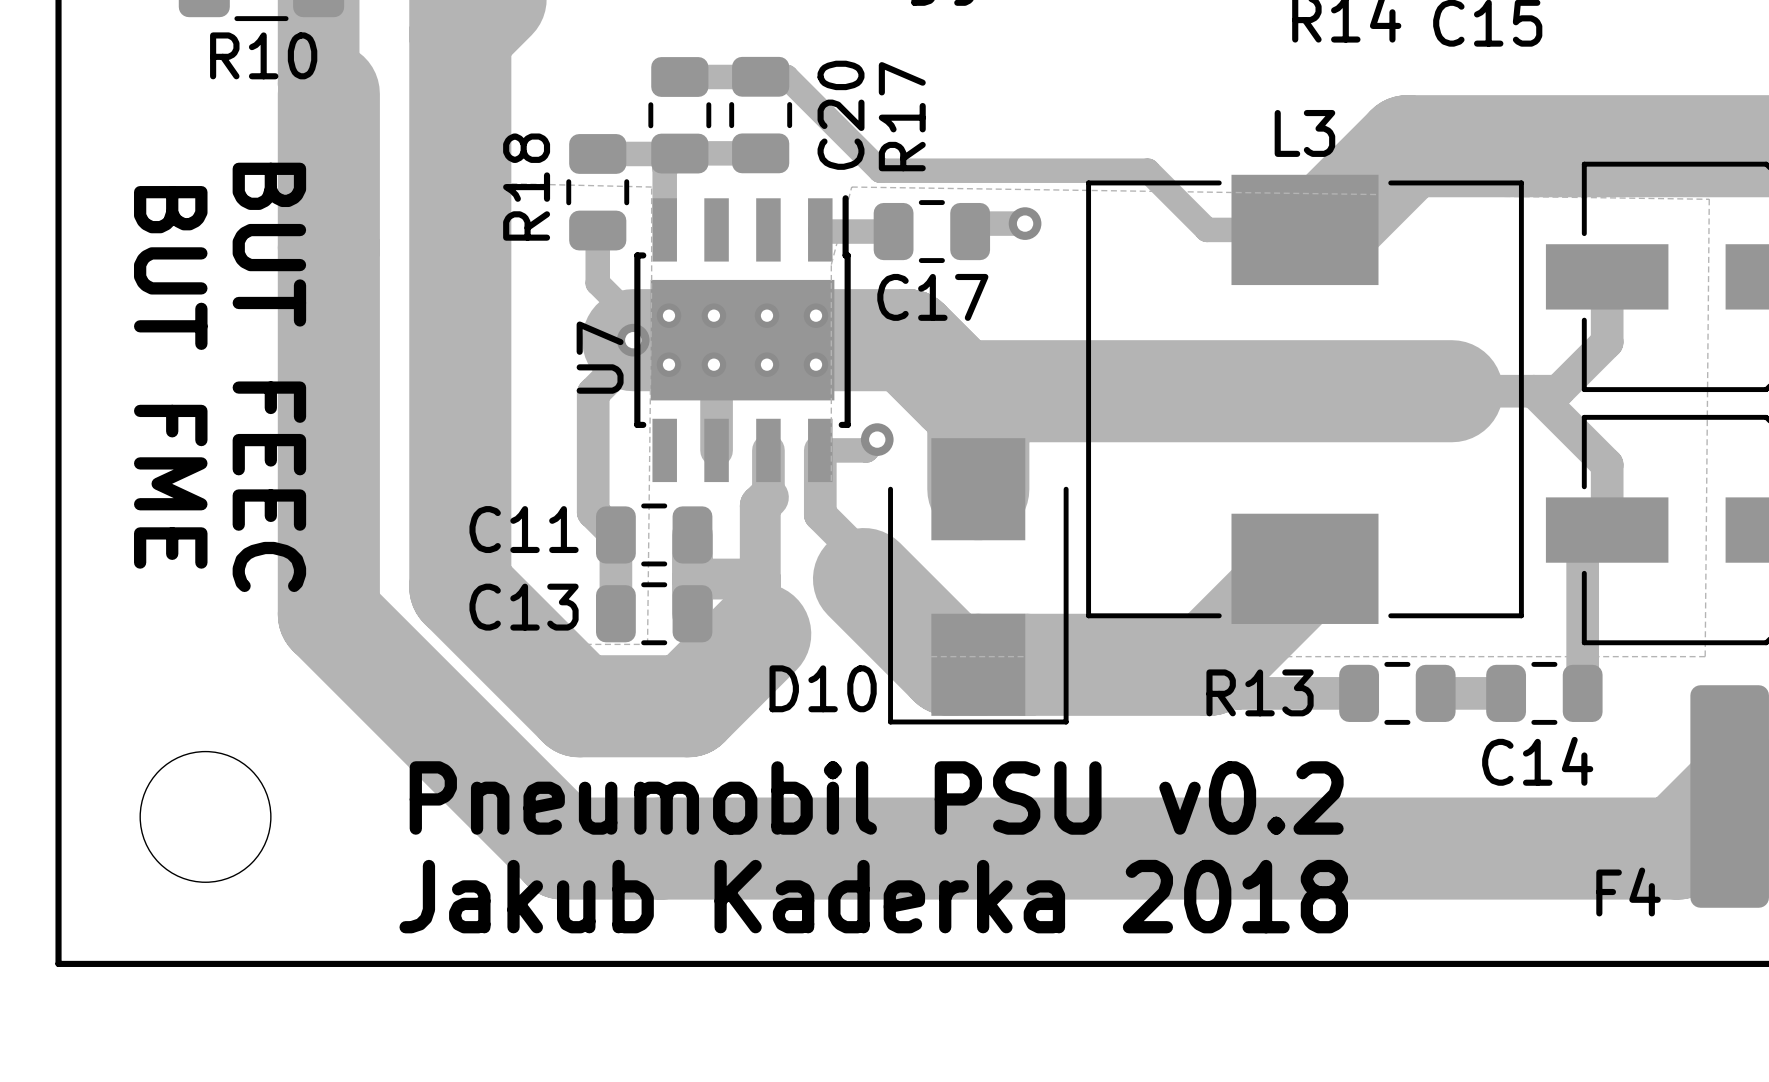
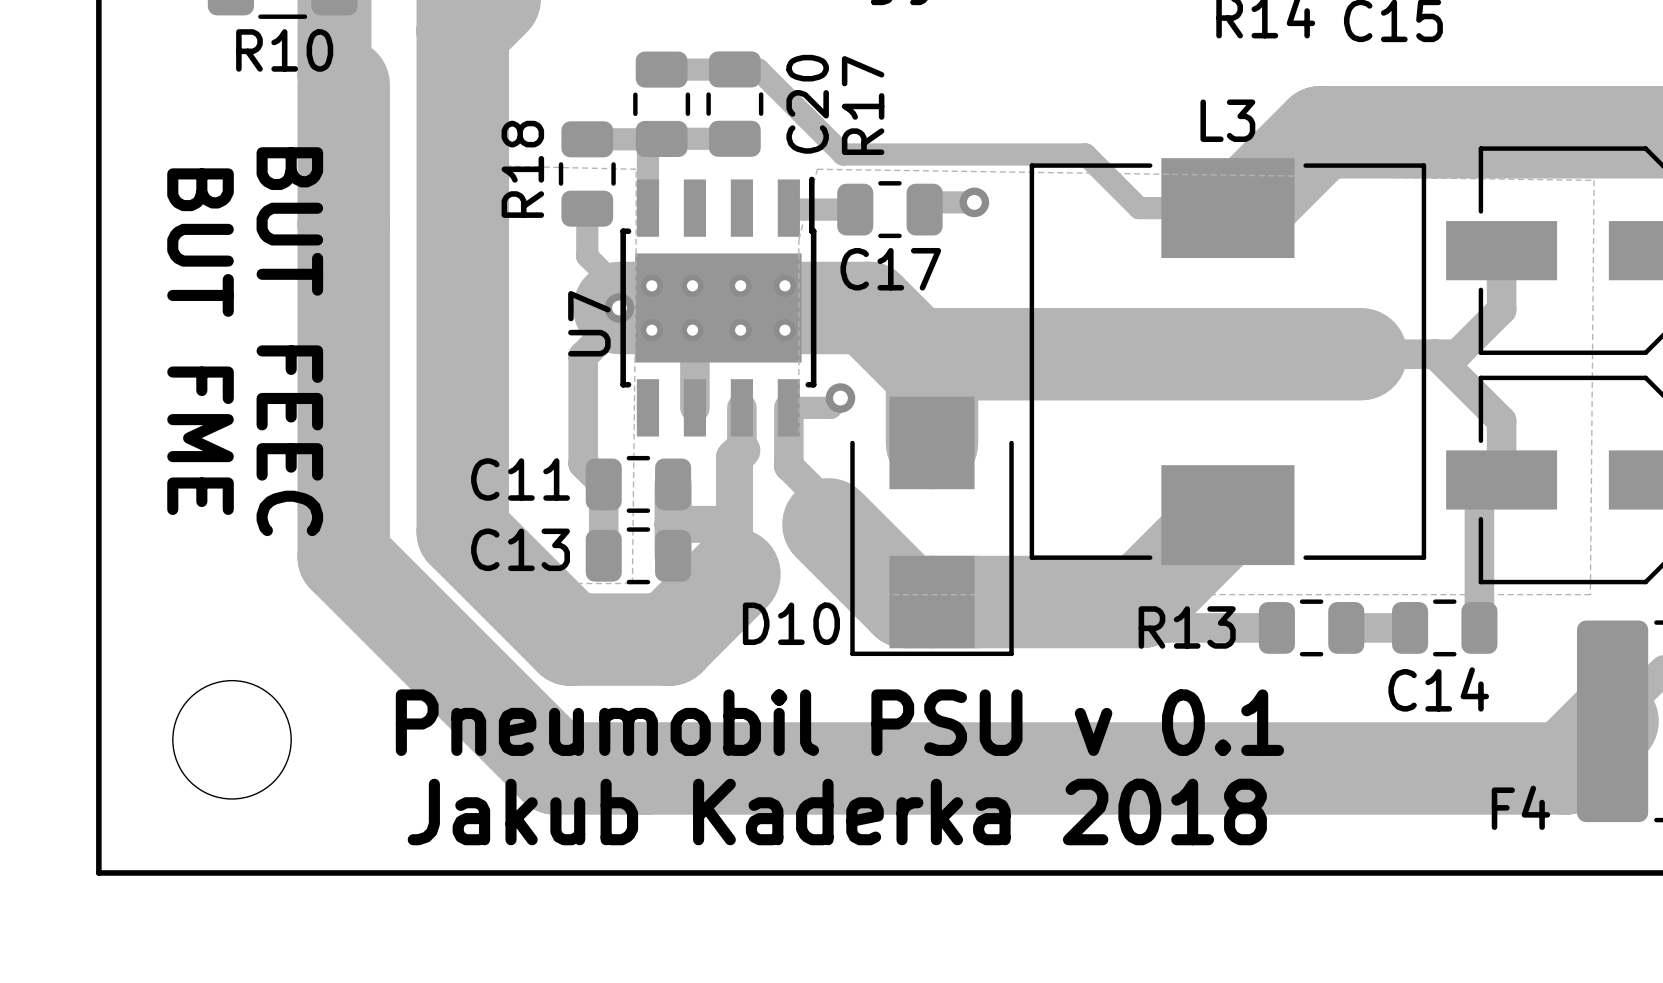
text: Pneumobil PSU v0.2 (876, 797) -> Pneumobil PSU v 0.1 (839, 722)

